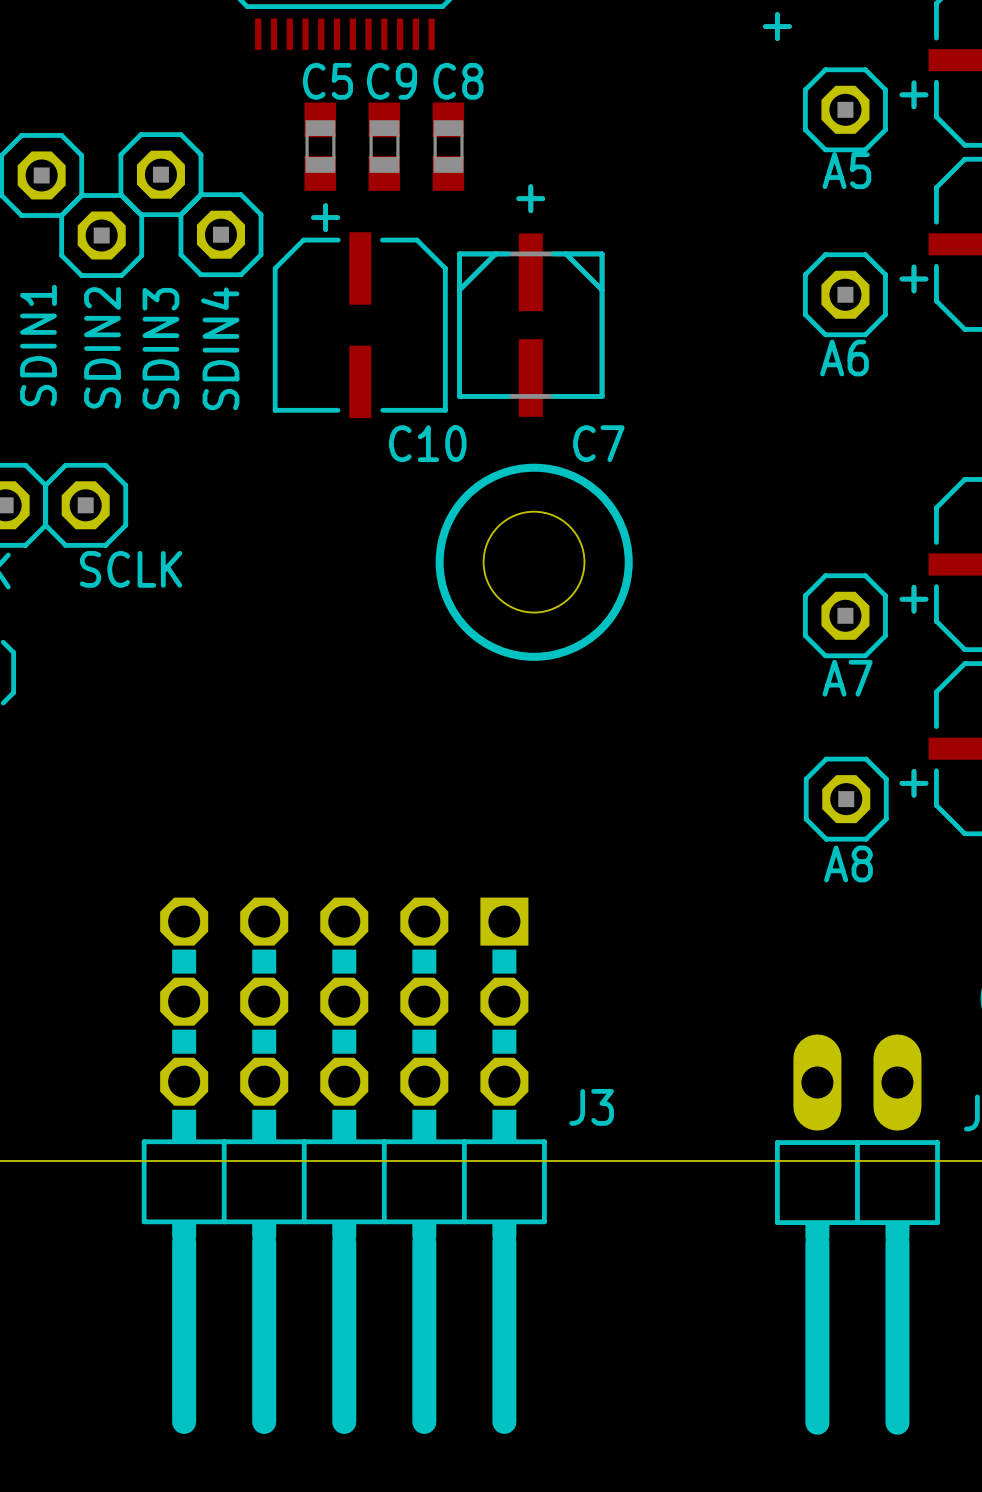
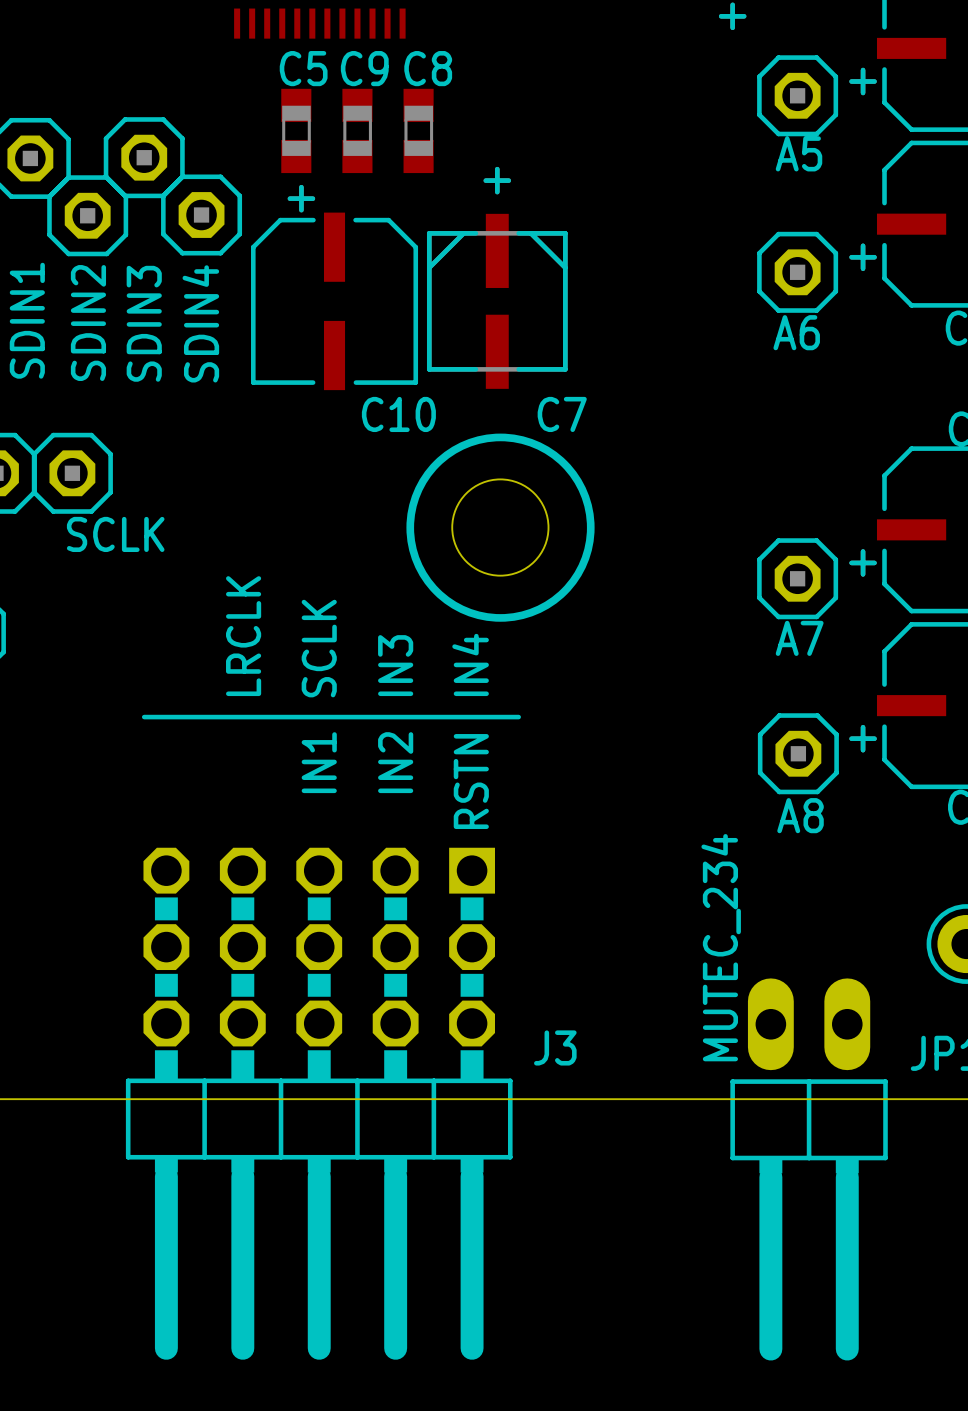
text: none -> LRCLK (243, 636)
text: none -> SCLK (319, 648)
text: none -> IN3 (395, 665)
text: none -> IN4 (470, 664)
line: none -> (144, 717) (518, 717)
text: none -> IN1 (319, 762)
text: none -> IN2 (395, 762)
text: none -> RSTN (471, 781)
text: none -> MUTEC_234 (721, 947)

